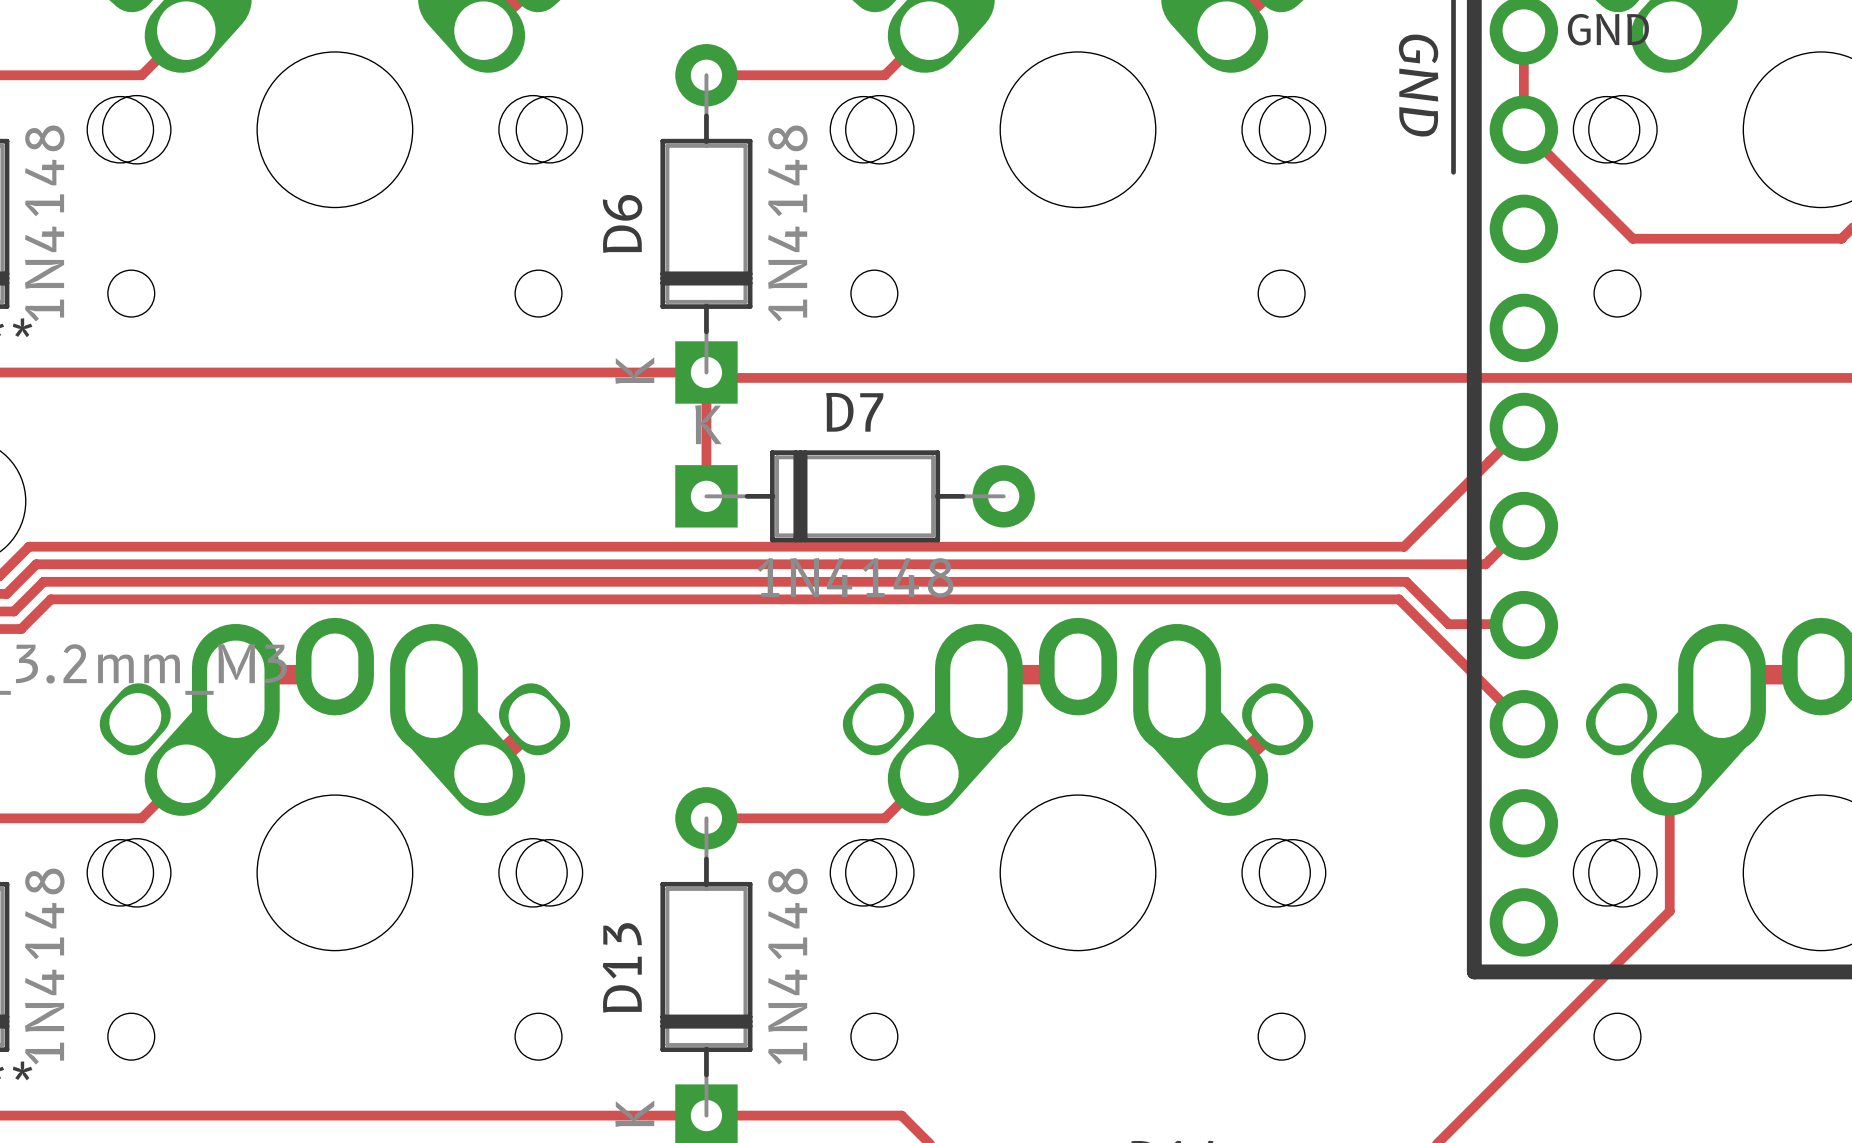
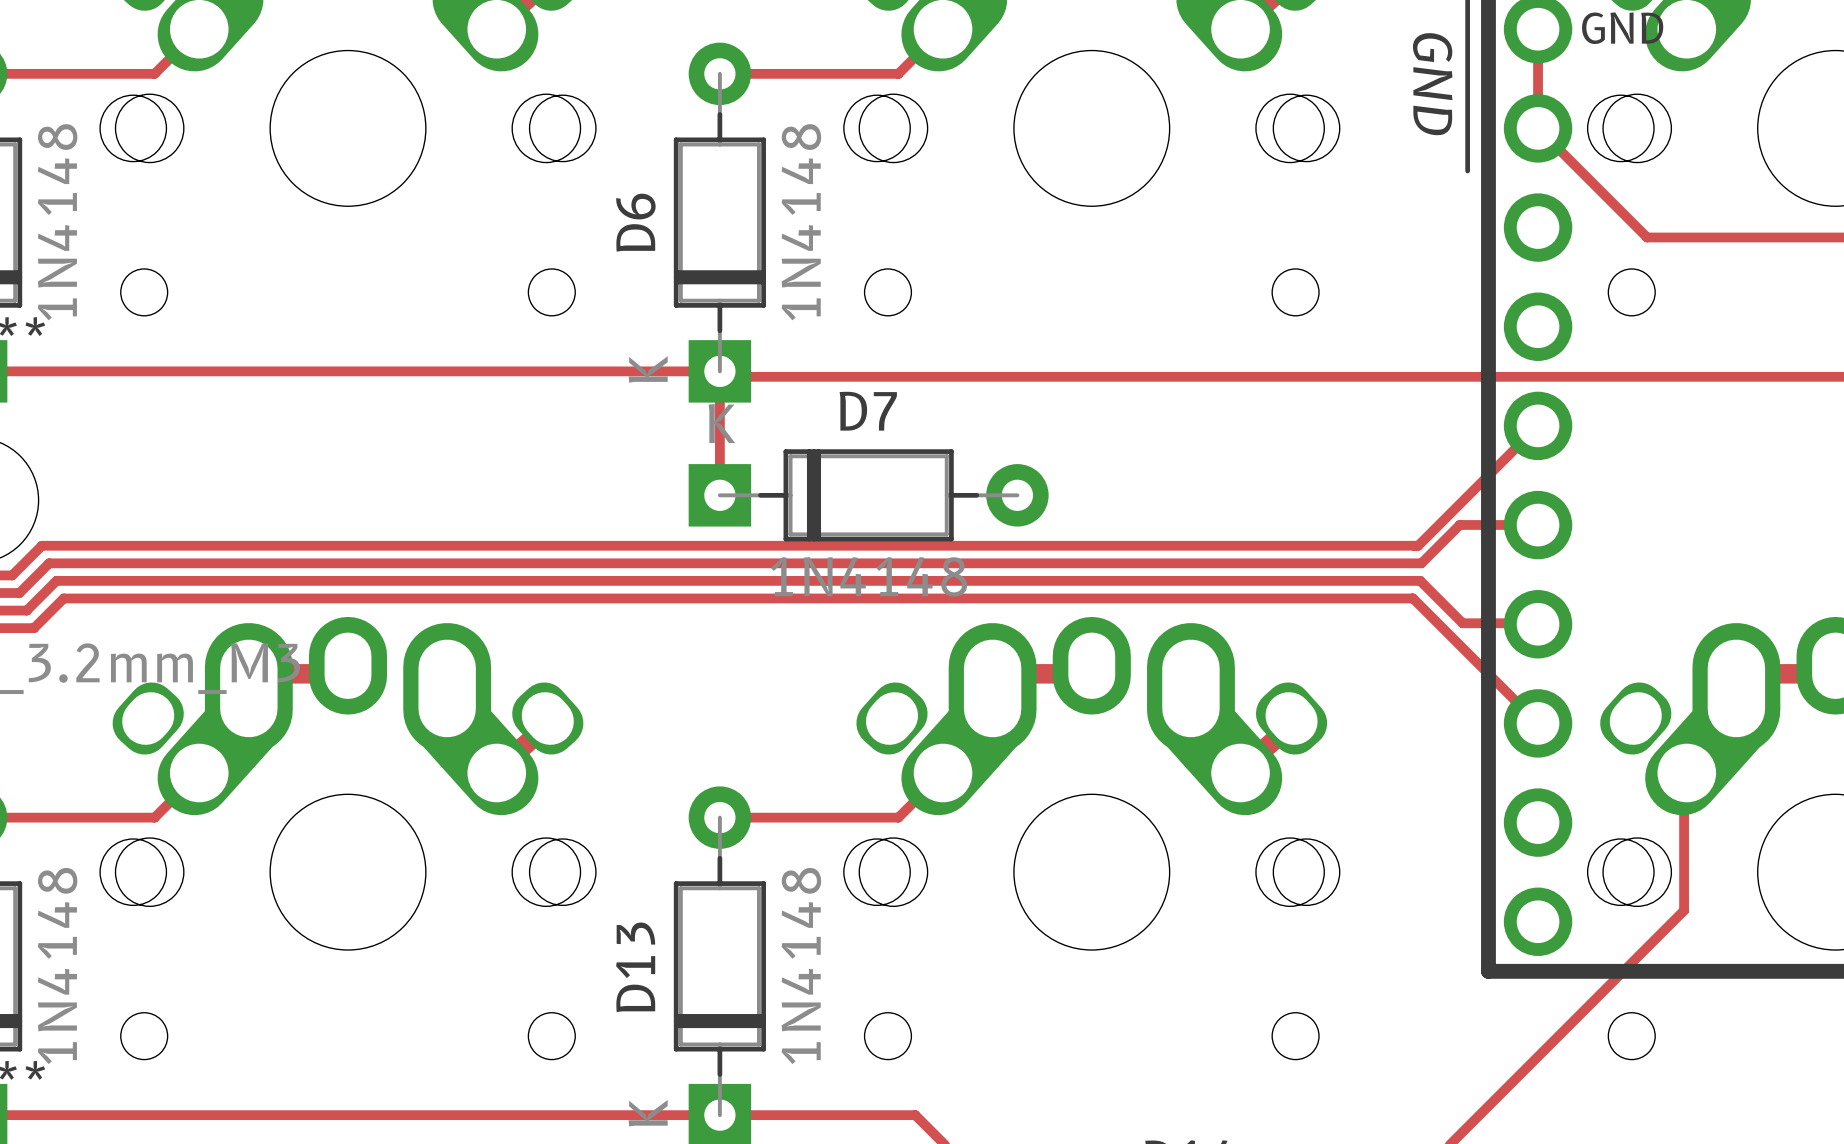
track: (1523, 526) (1485, 564) (1407, 564) -> (1537, 524) (1459, 524) (1421, 563)

